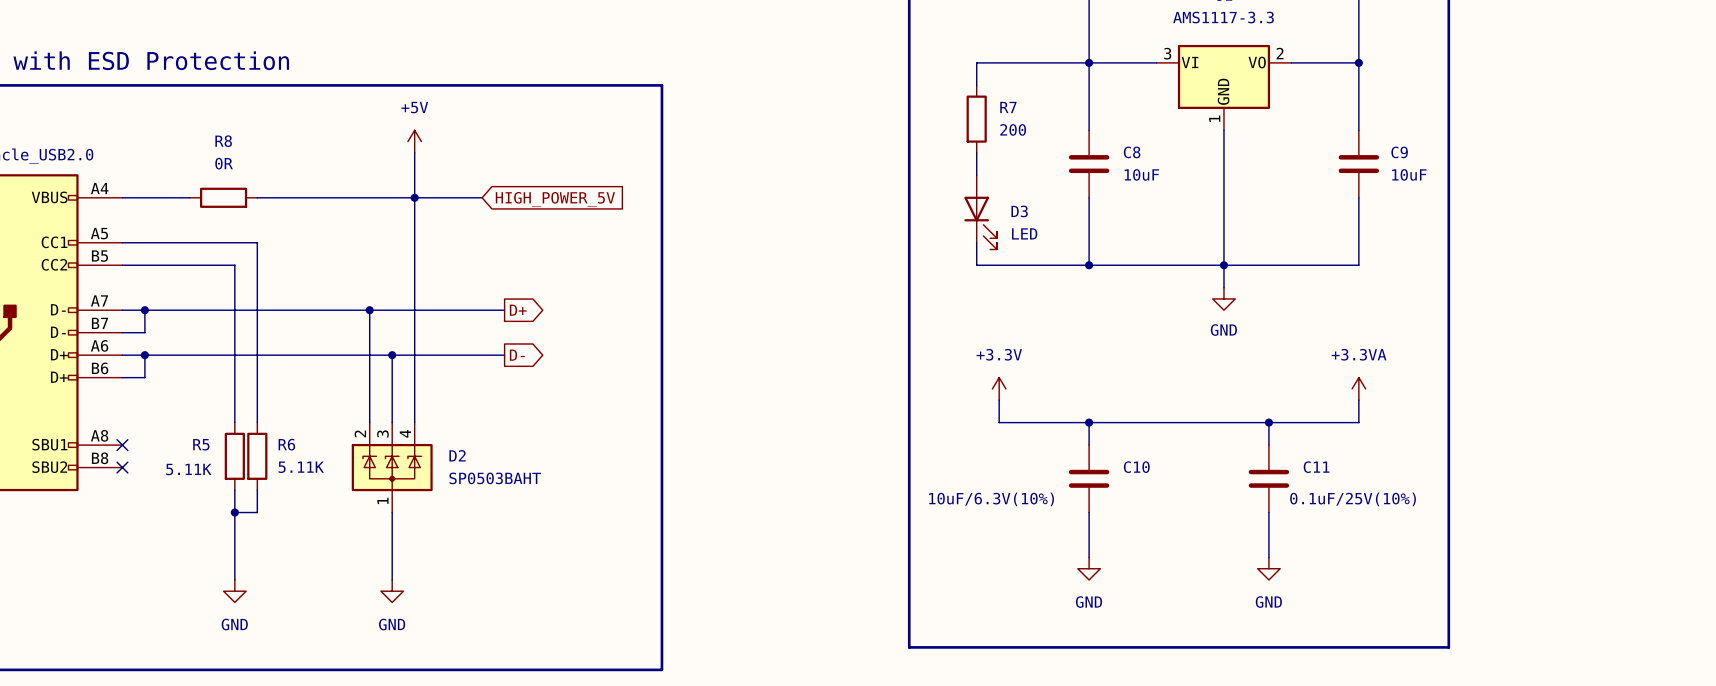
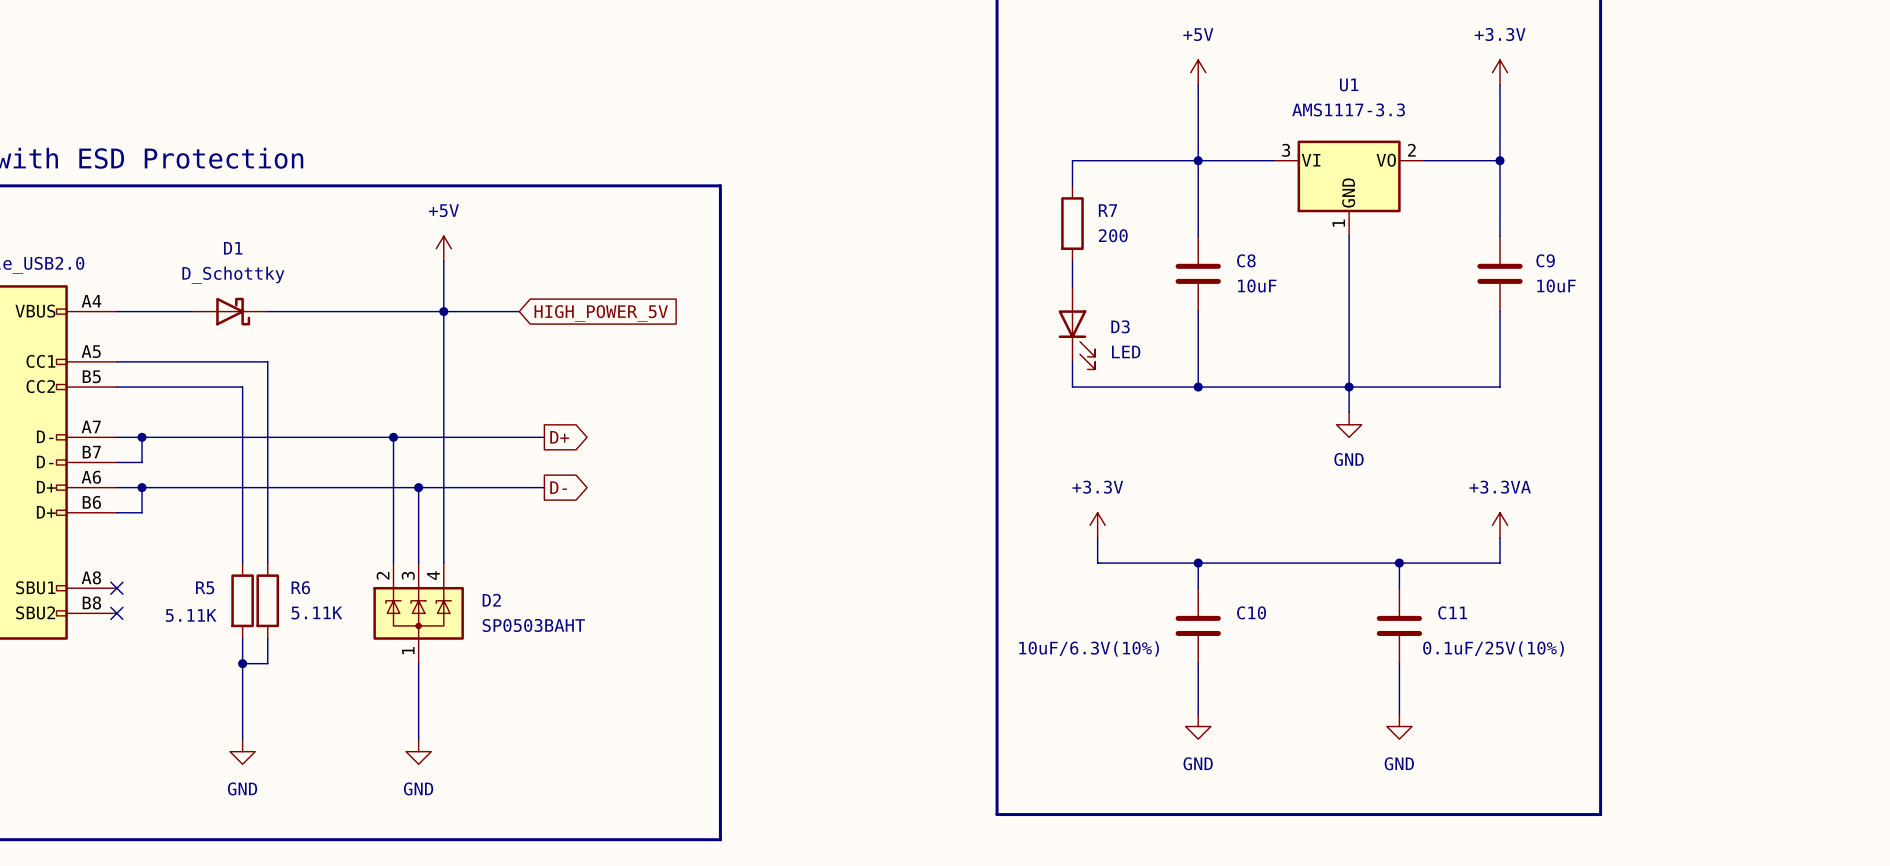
R8: 0R (223, 197) -> none
D1: none -> D_Schottky (230, 311)

